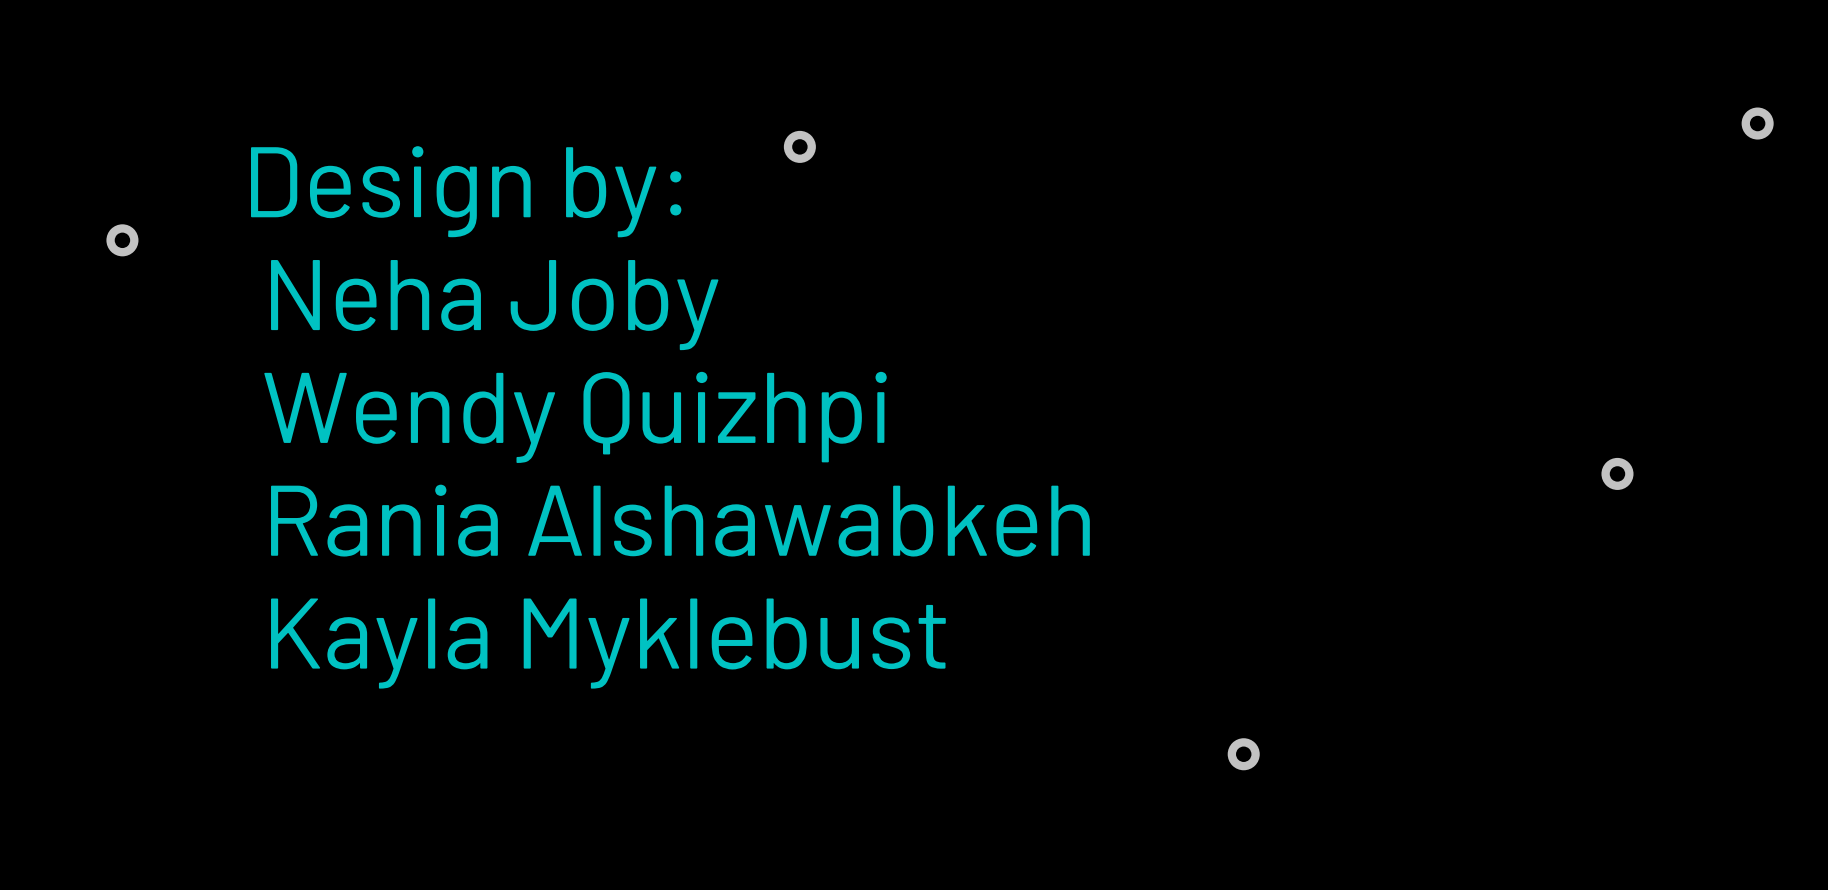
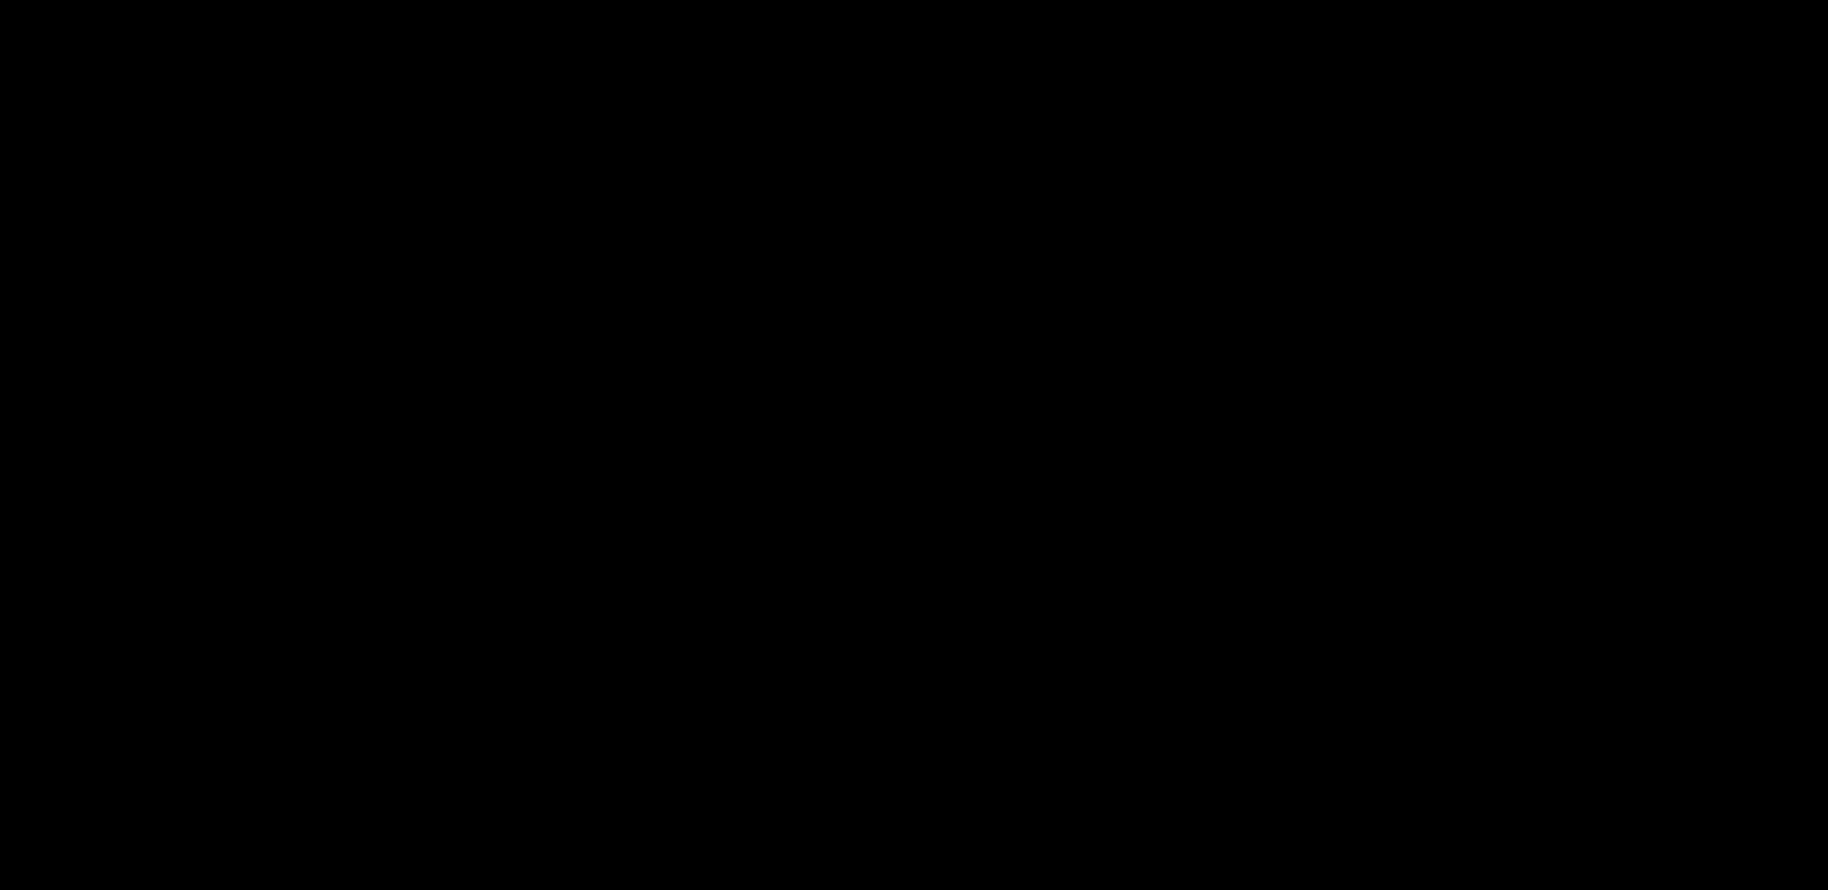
via: (1757, 123) -> none
via: (799, 146) -> none
text: Design by: (466, 191) -> none
via: (122, 240) -> none
text: Neha Joby (494, 305) -> none
text: Wendy Quizhpi (575, 417) -> none
via: (1617, 473) -> none
text: Rania Alshawabkeh (680, 520) -> none
text: Kayla Myklebust (608, 643) -> none
via: (1243, 754) -> none

